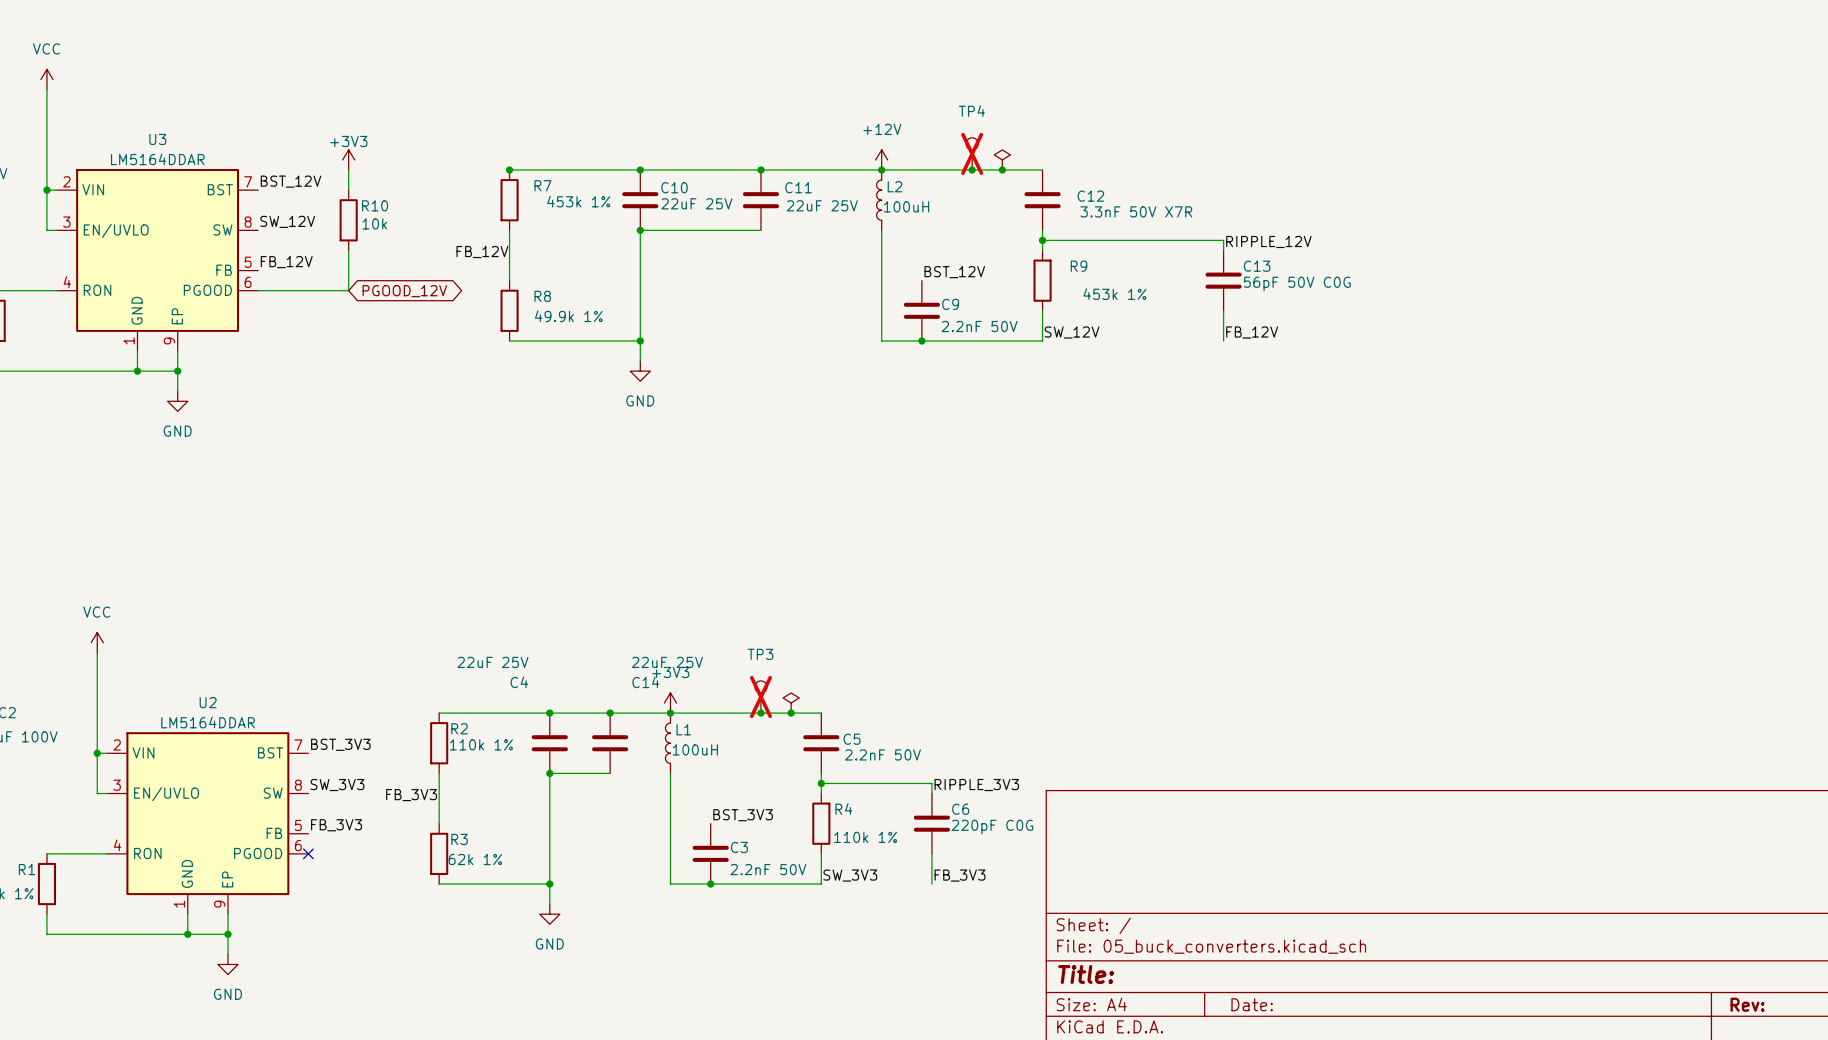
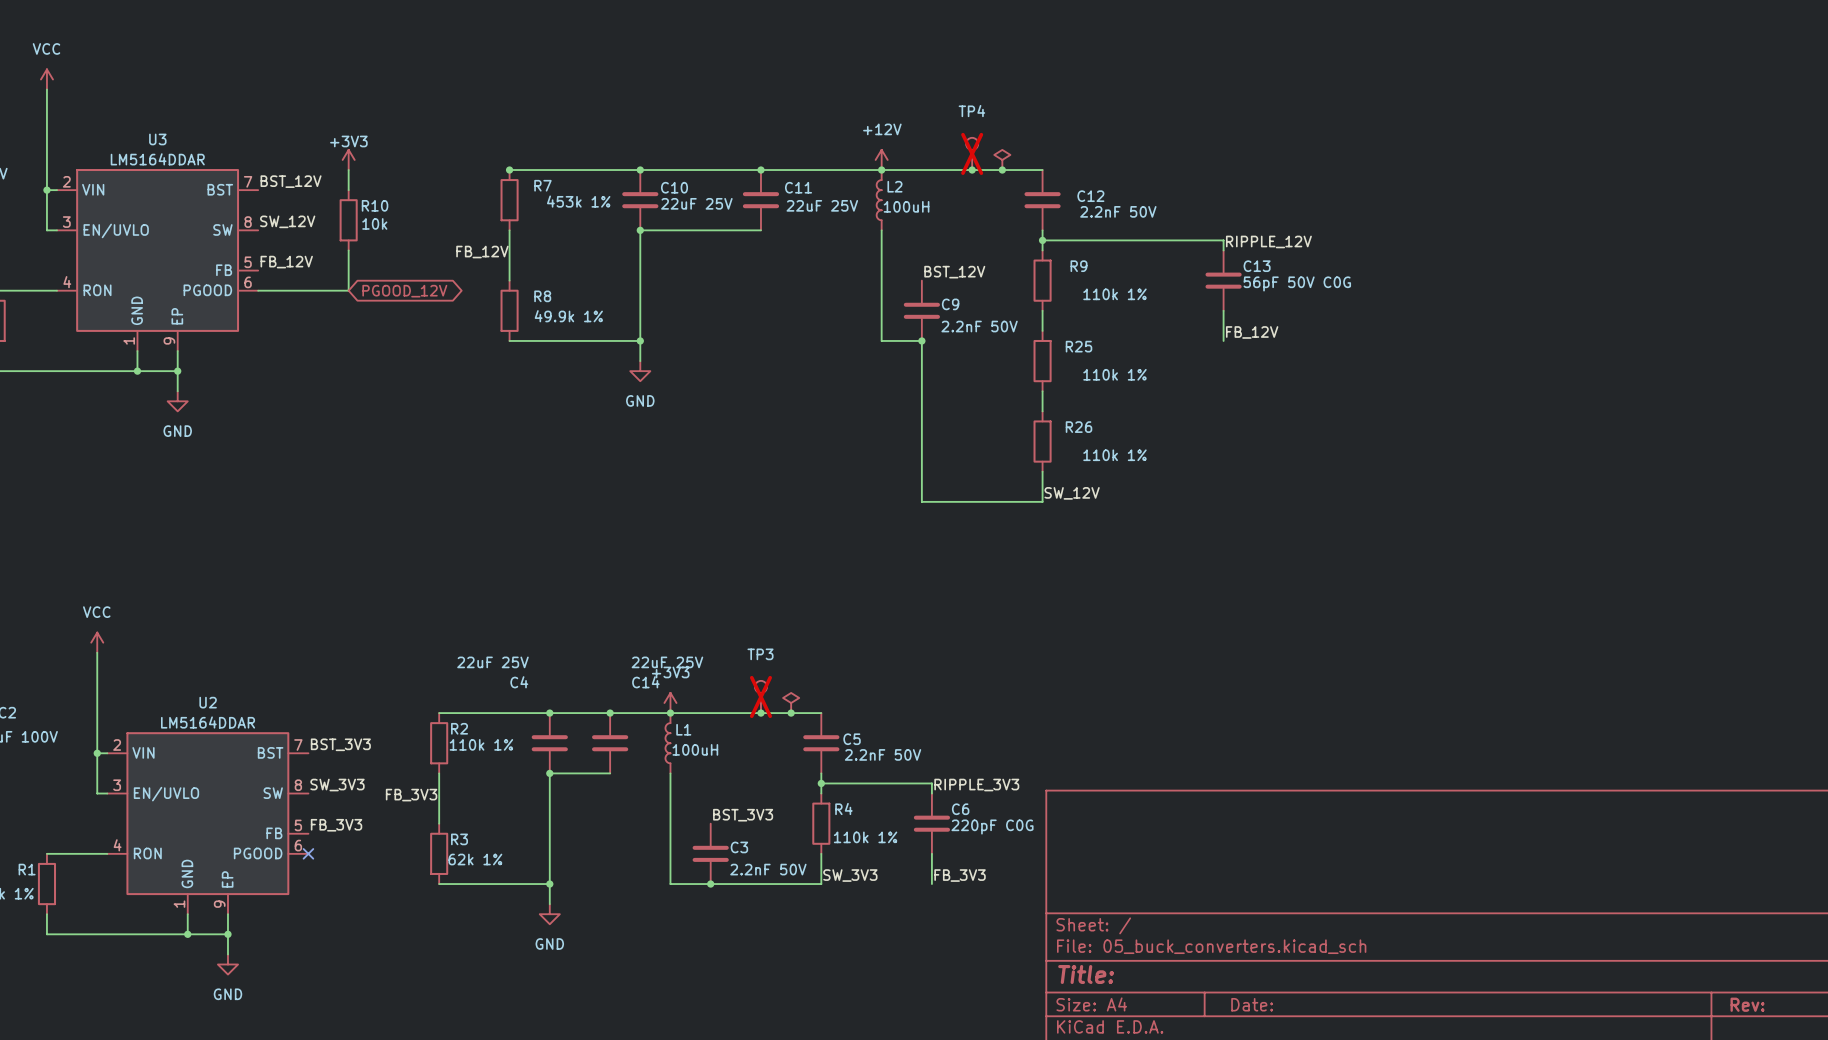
C12 value: 3.3nF 50V X7R (1136, 211) -> 2.2nF 50V (1118, 211)
R9 value: 453k 1% (1114, 294) -> 110k 1% (1114, 294)
wire: (1042, 330) (1042, 340) (921, 340) -> (1042, 471) (1042, 501) (921, 501) (921, 340)
label position: SW_12V (1072, 332) -> SW_12V (1072, 493)
R25: none -> 110k 1% (1042, 361)
wire: none -> (1042, 391) (1042, 411)
R26: none -> 110k 1% (1042, 441)

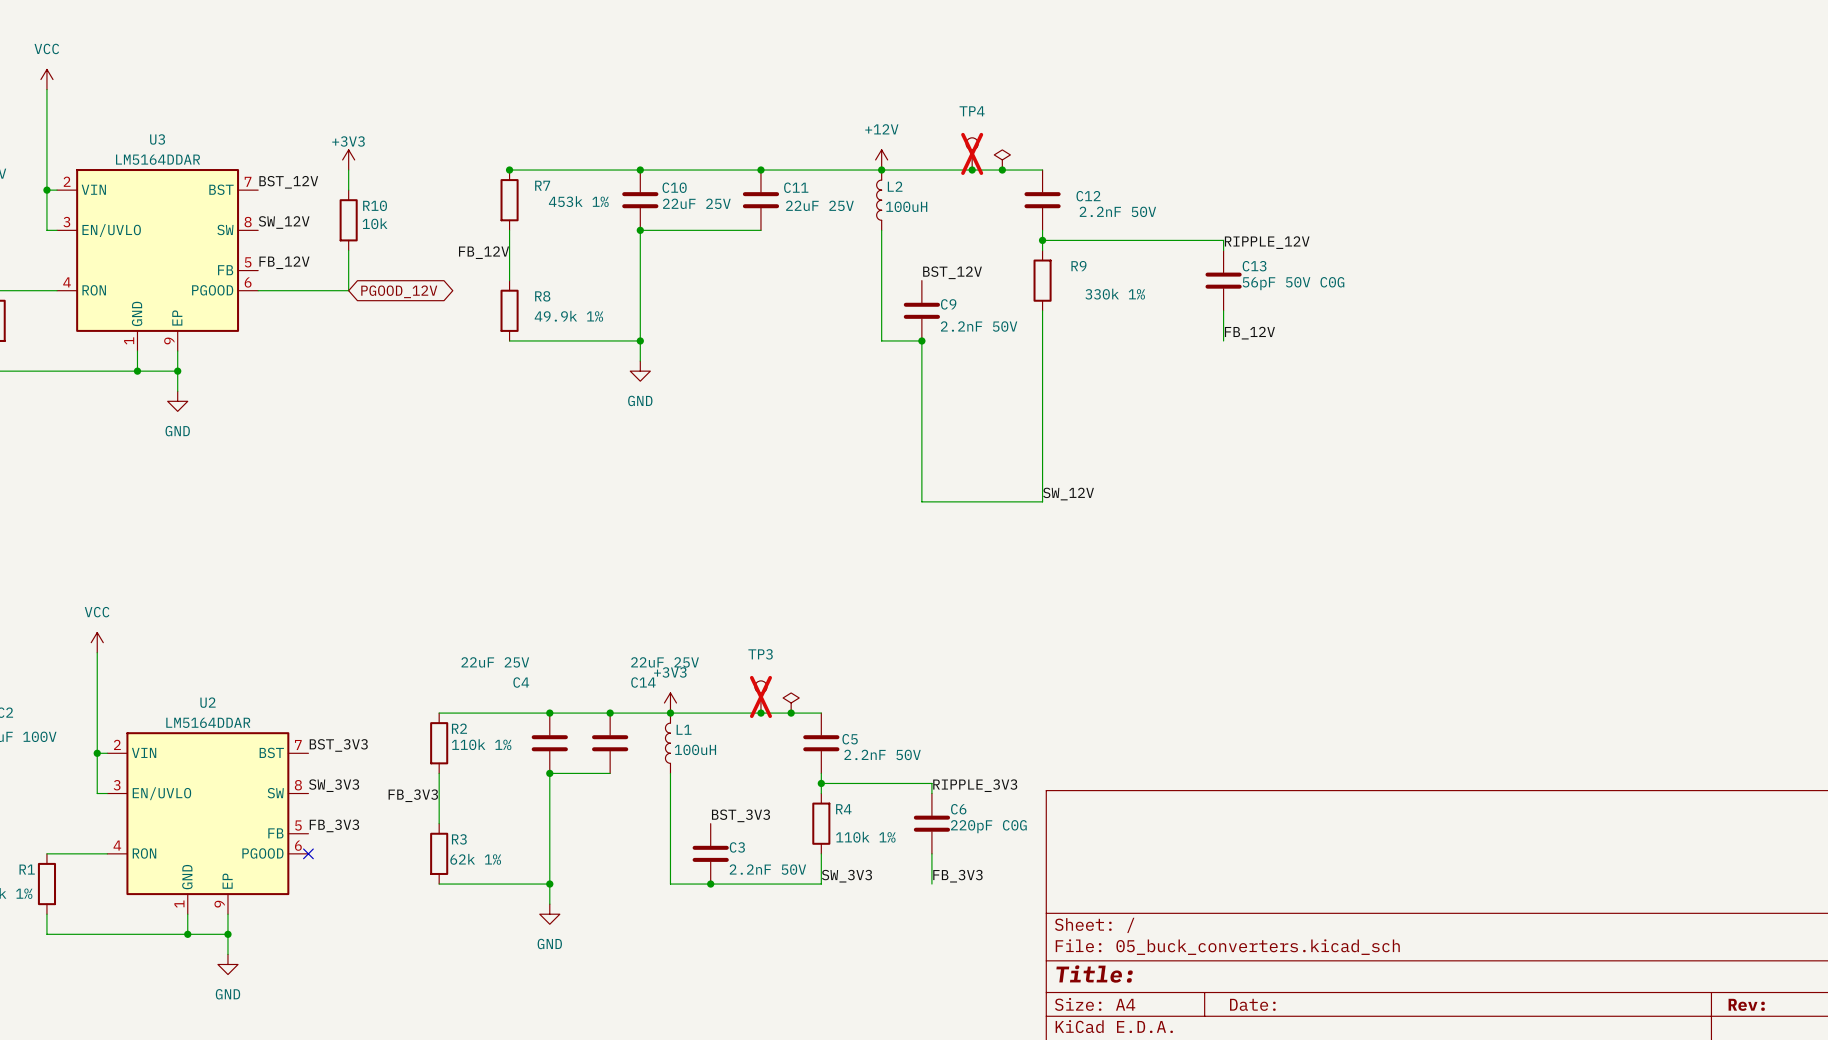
R9 value: 110k 1% (1114, 294) -> 330k 1% (1115, 294)
wire: none -> (1042, 330) (1042, 391)
R25: 110k 1% (1042, 361) -> none
wire: none -> (1042, 411) (1042, 471)
R26: 110k 1% (1042, 441) -> none

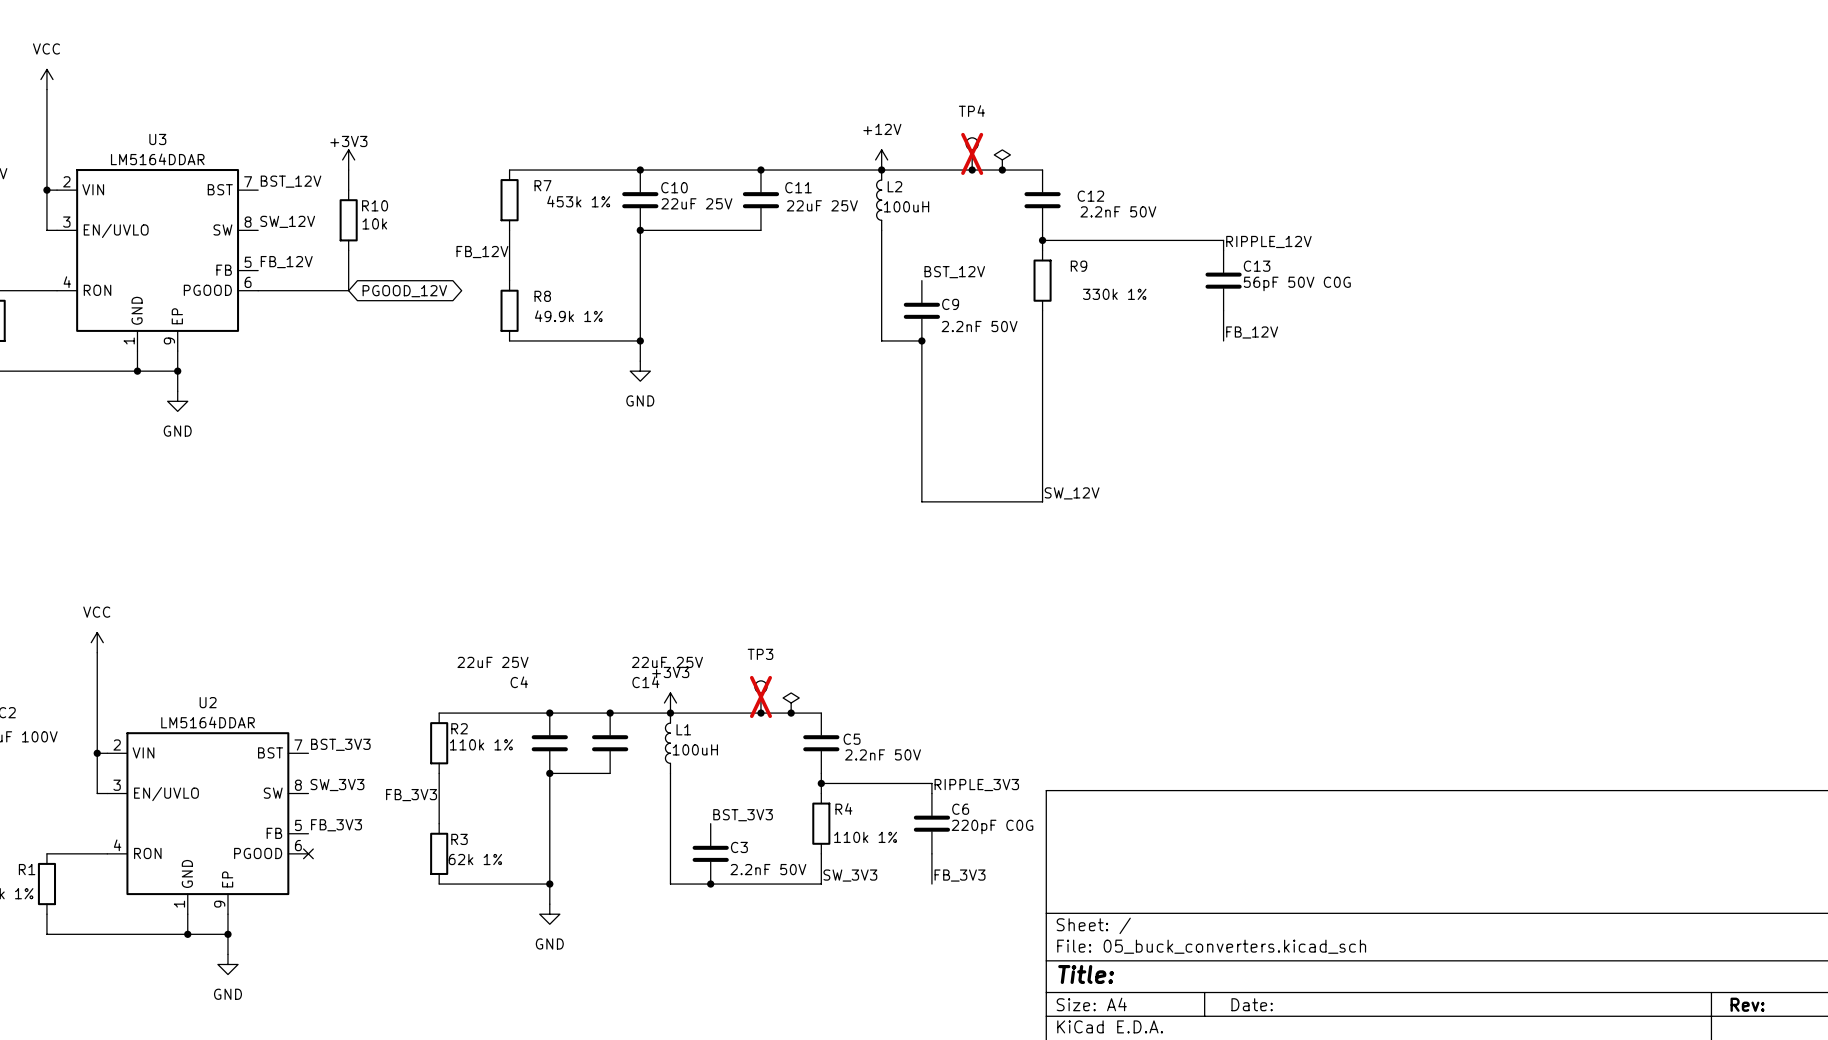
junction: (509, 170) -> none

